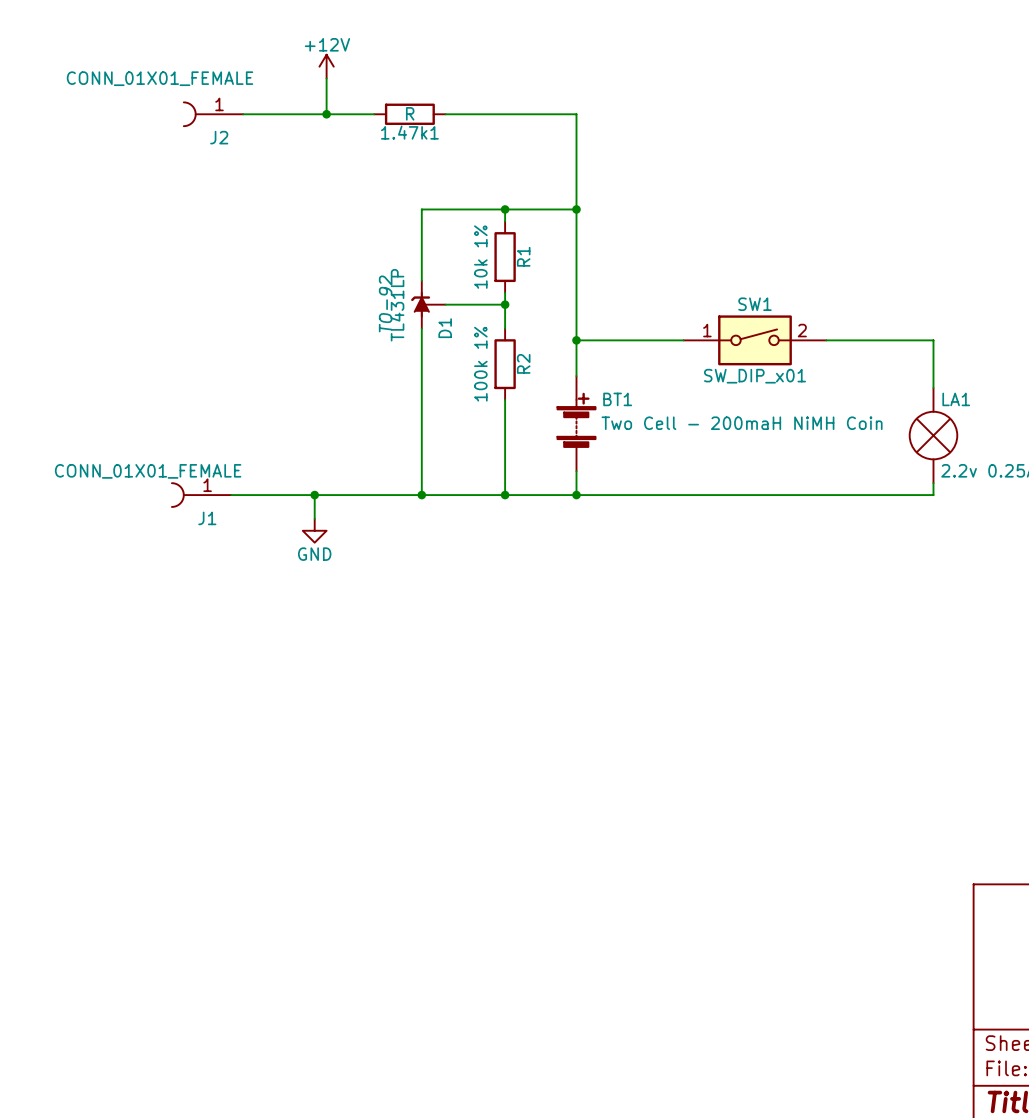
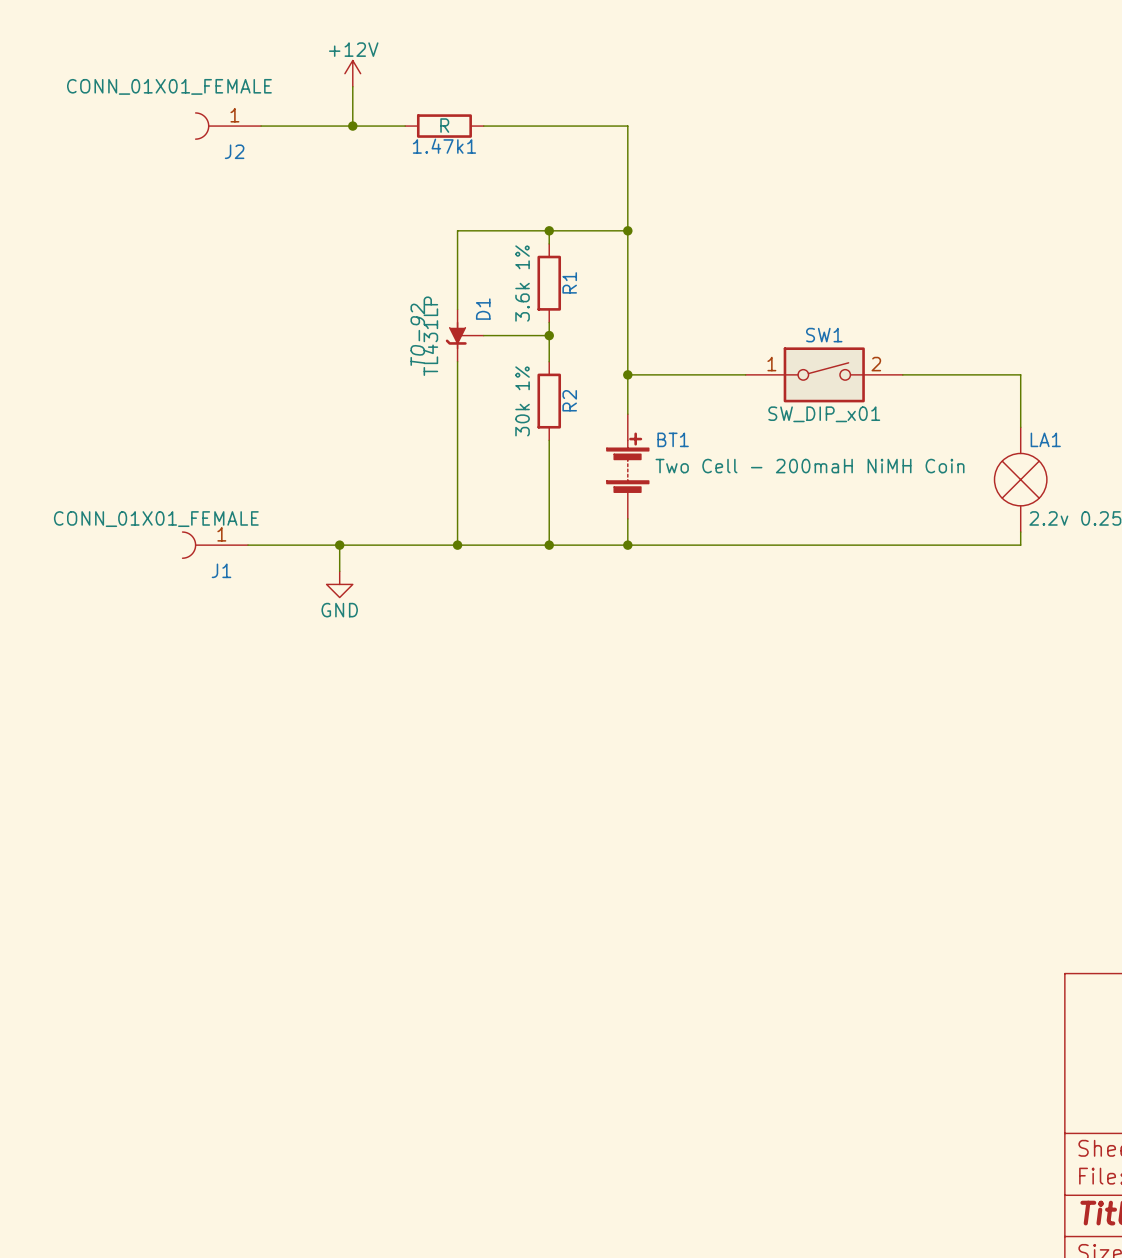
R1 value: 10k 1% (480, 257) -> 3.6k 1% (522, 283)
D1 flip: as is (420, 304) -> up-down (456, 335)
R2 value: 100k 1% (480, 364) -> 30k 1% (522, 401)

